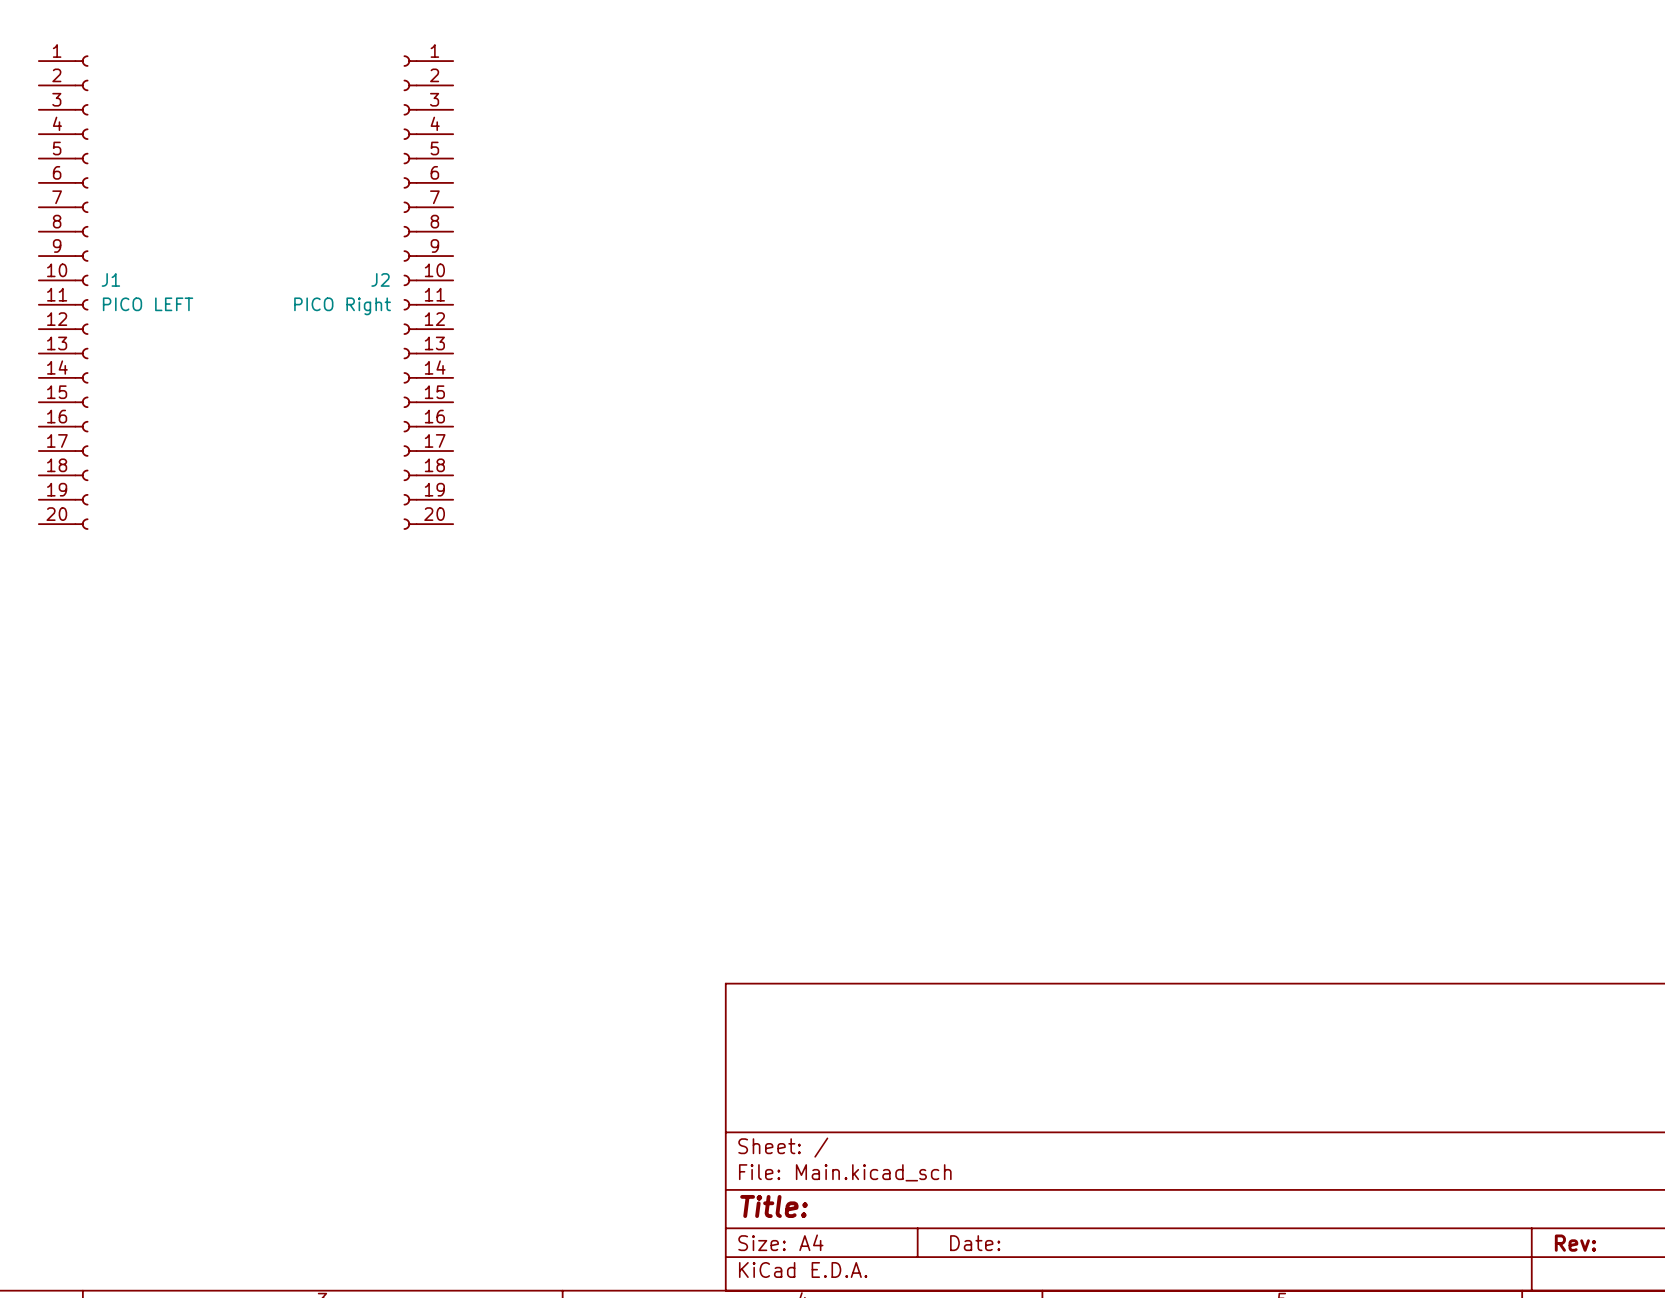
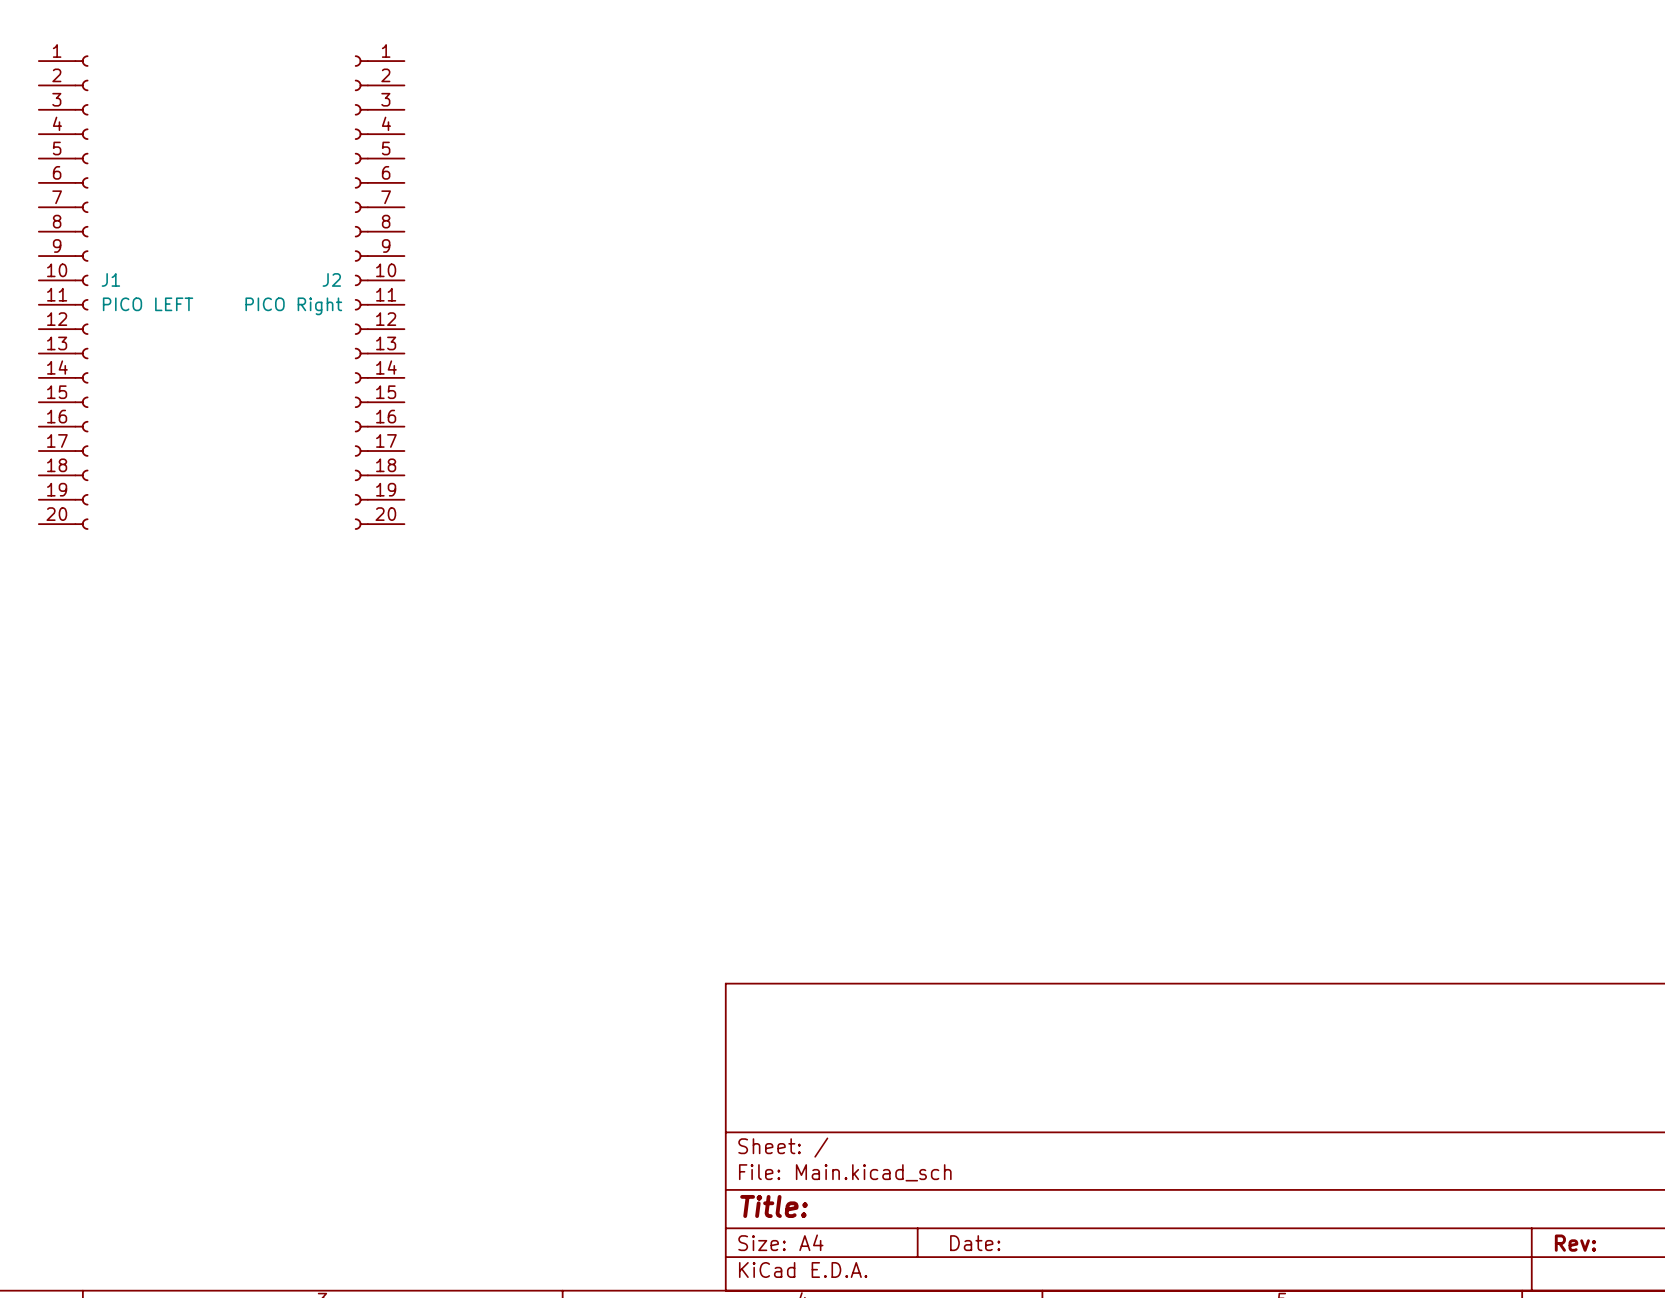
J2 position: (428, 292) -> (379, 292)

